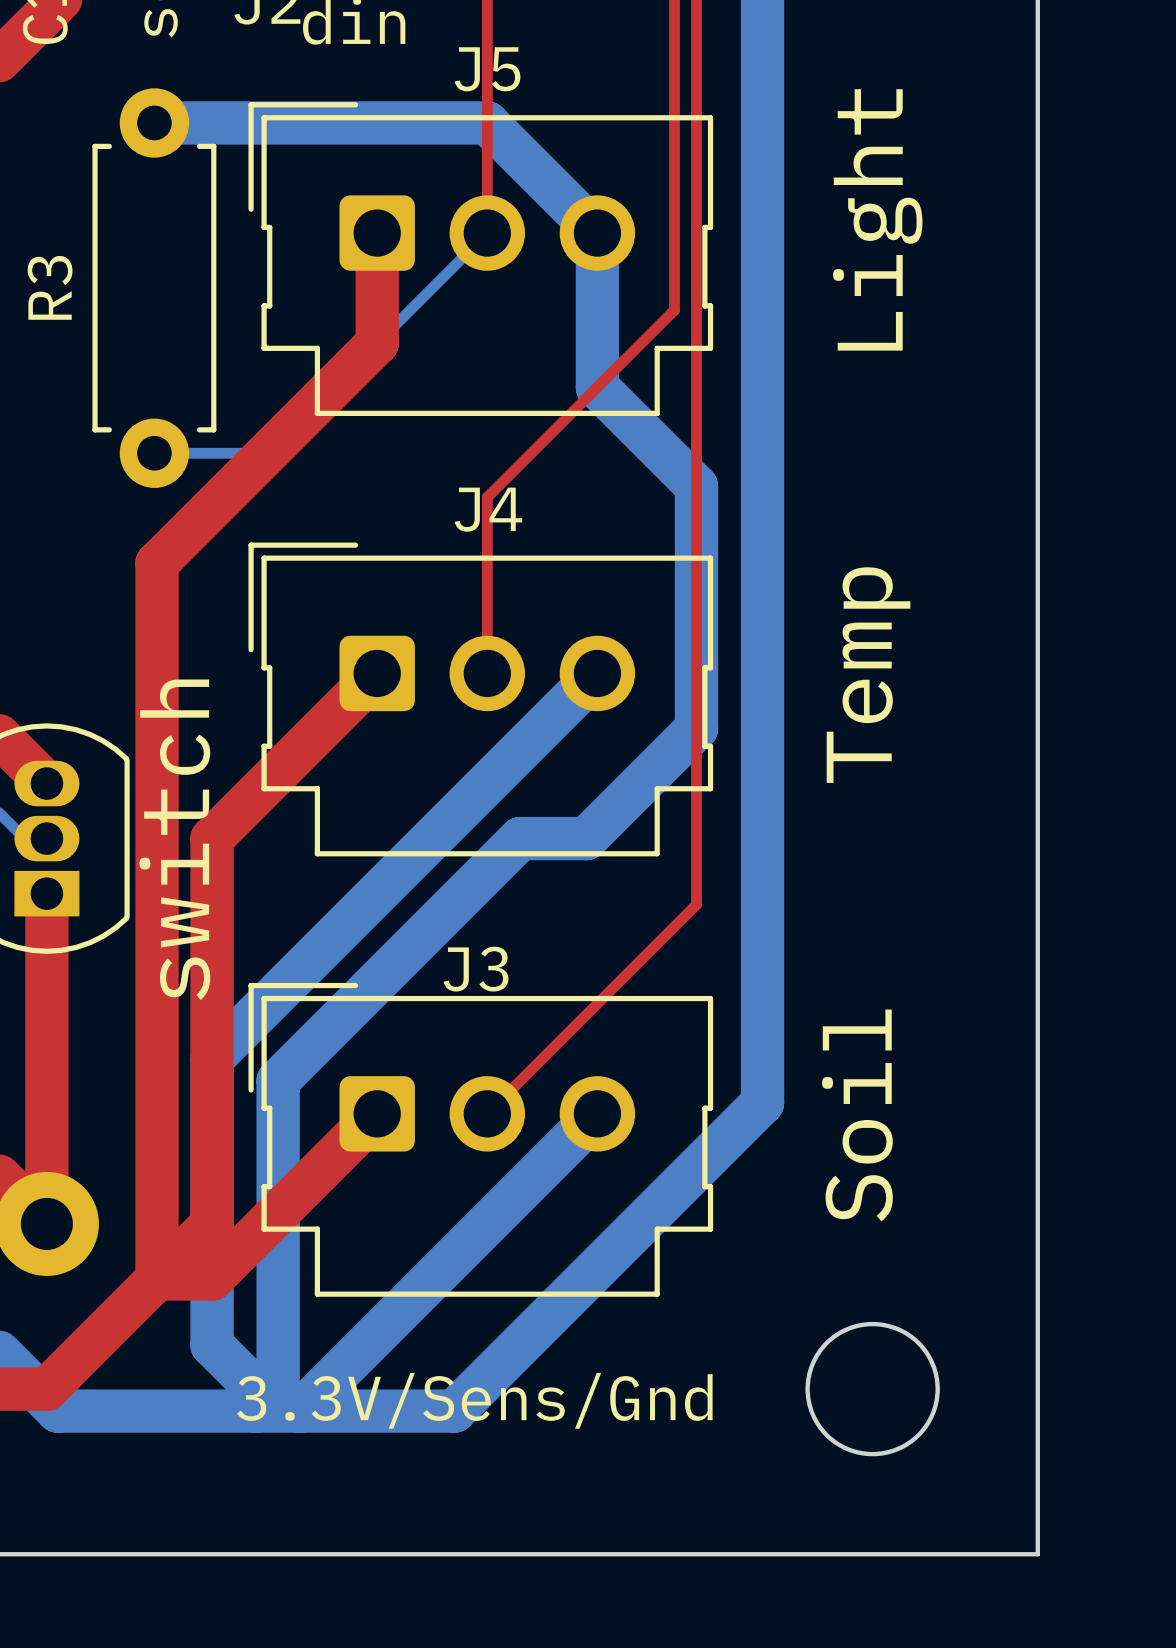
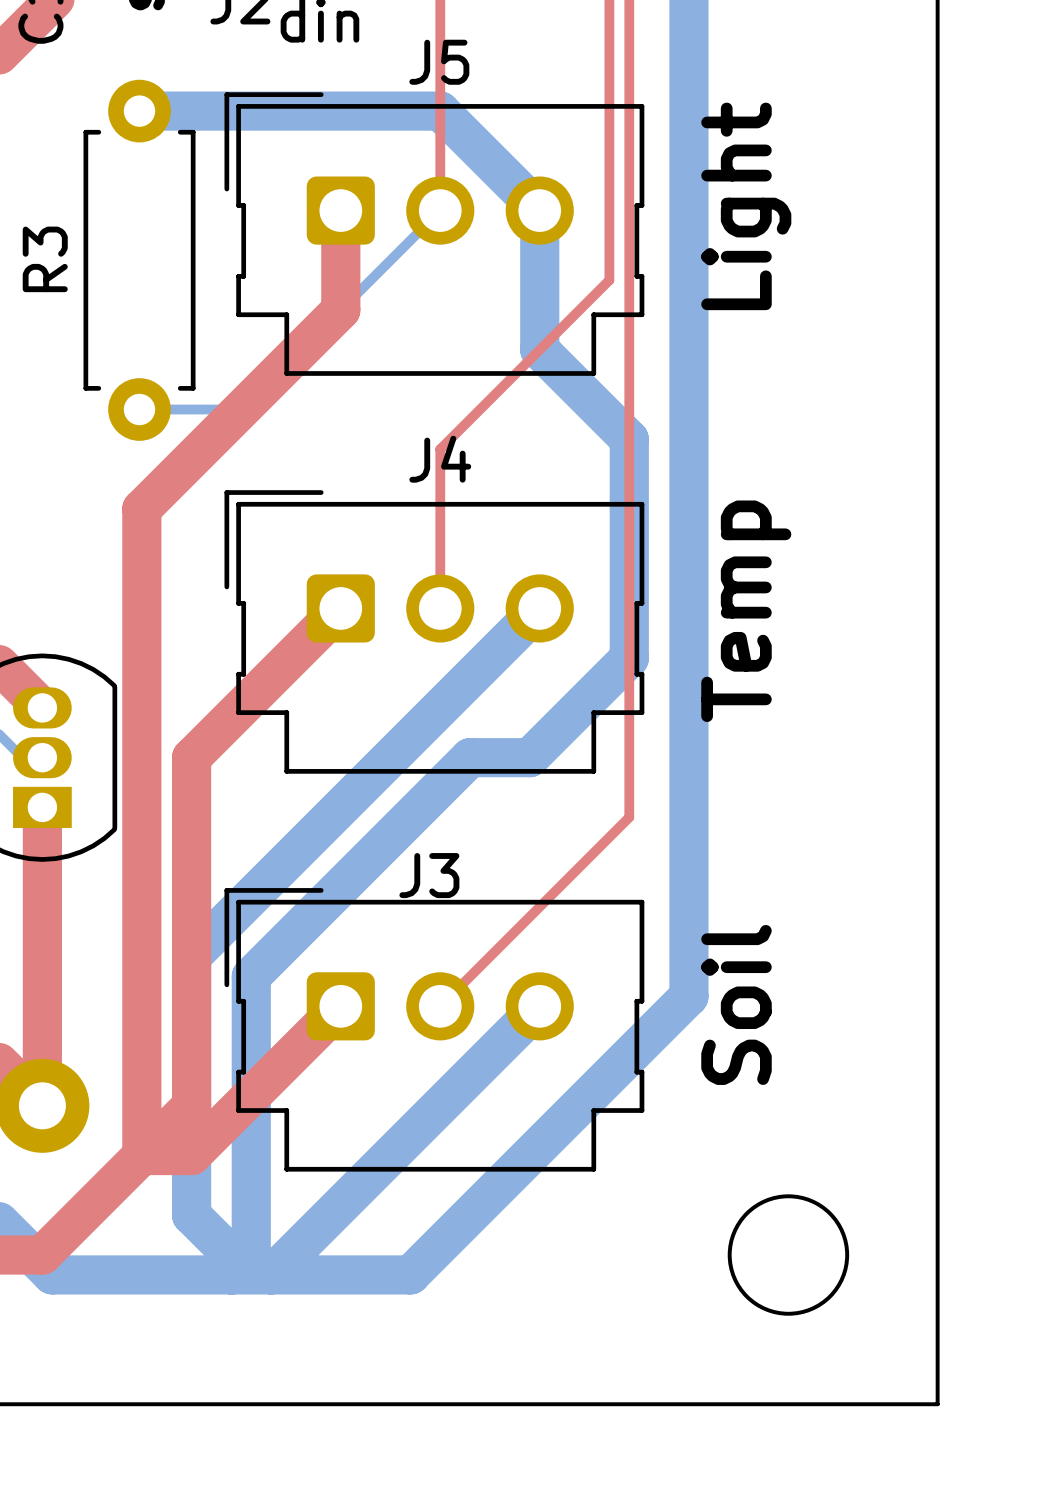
text position: Light (877, 219) -> Light (746, 206)
text position: Temp (868, 675) -> Temp (746, 611)
text: switch (174, 839) -> none
text position: Soil (857, 1115) -> Soil (736, 1004)
text: 3.3V/Sens/Gnd (474, 1400) -> none

